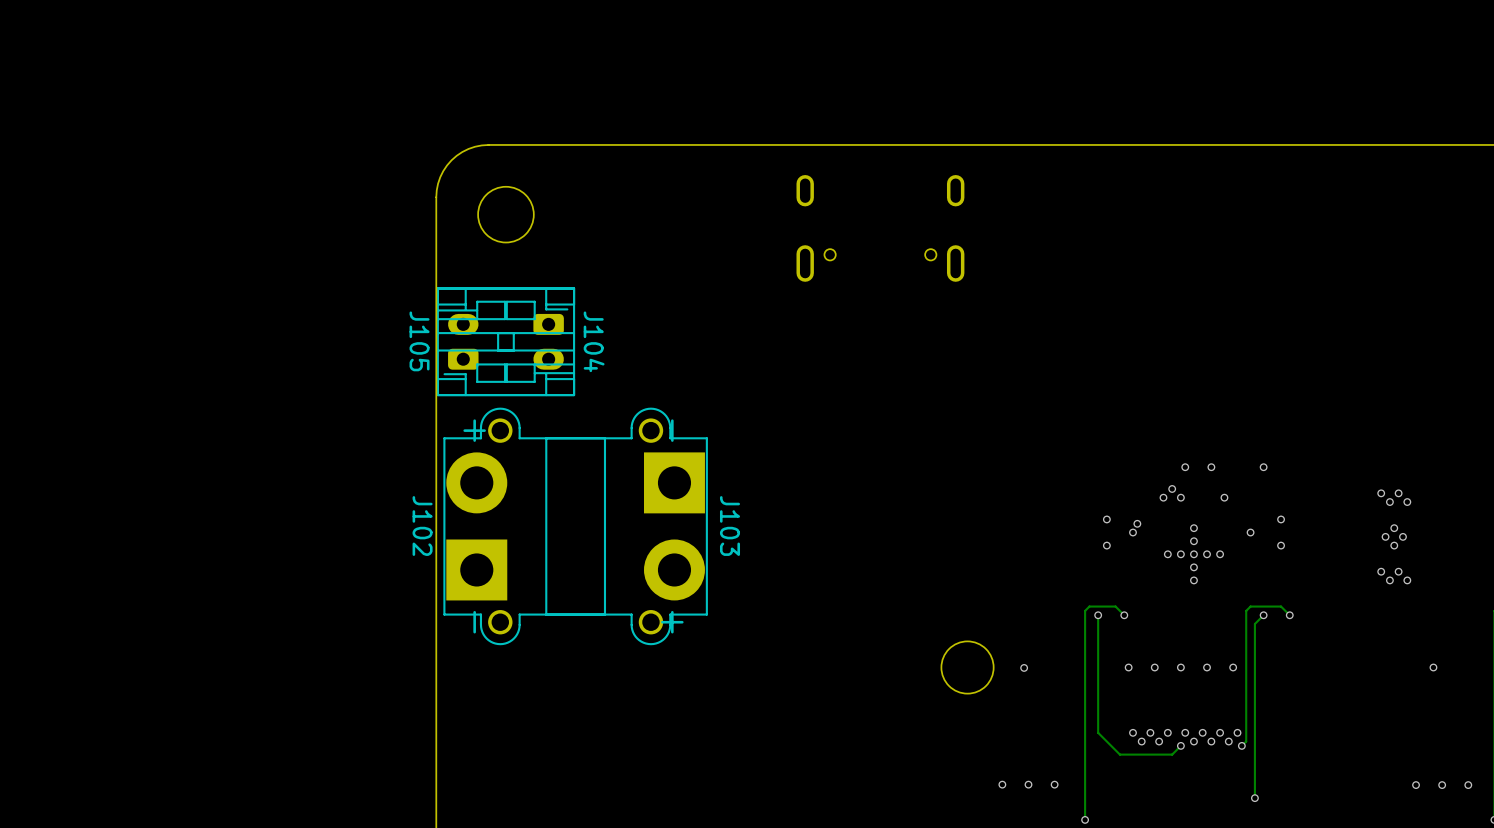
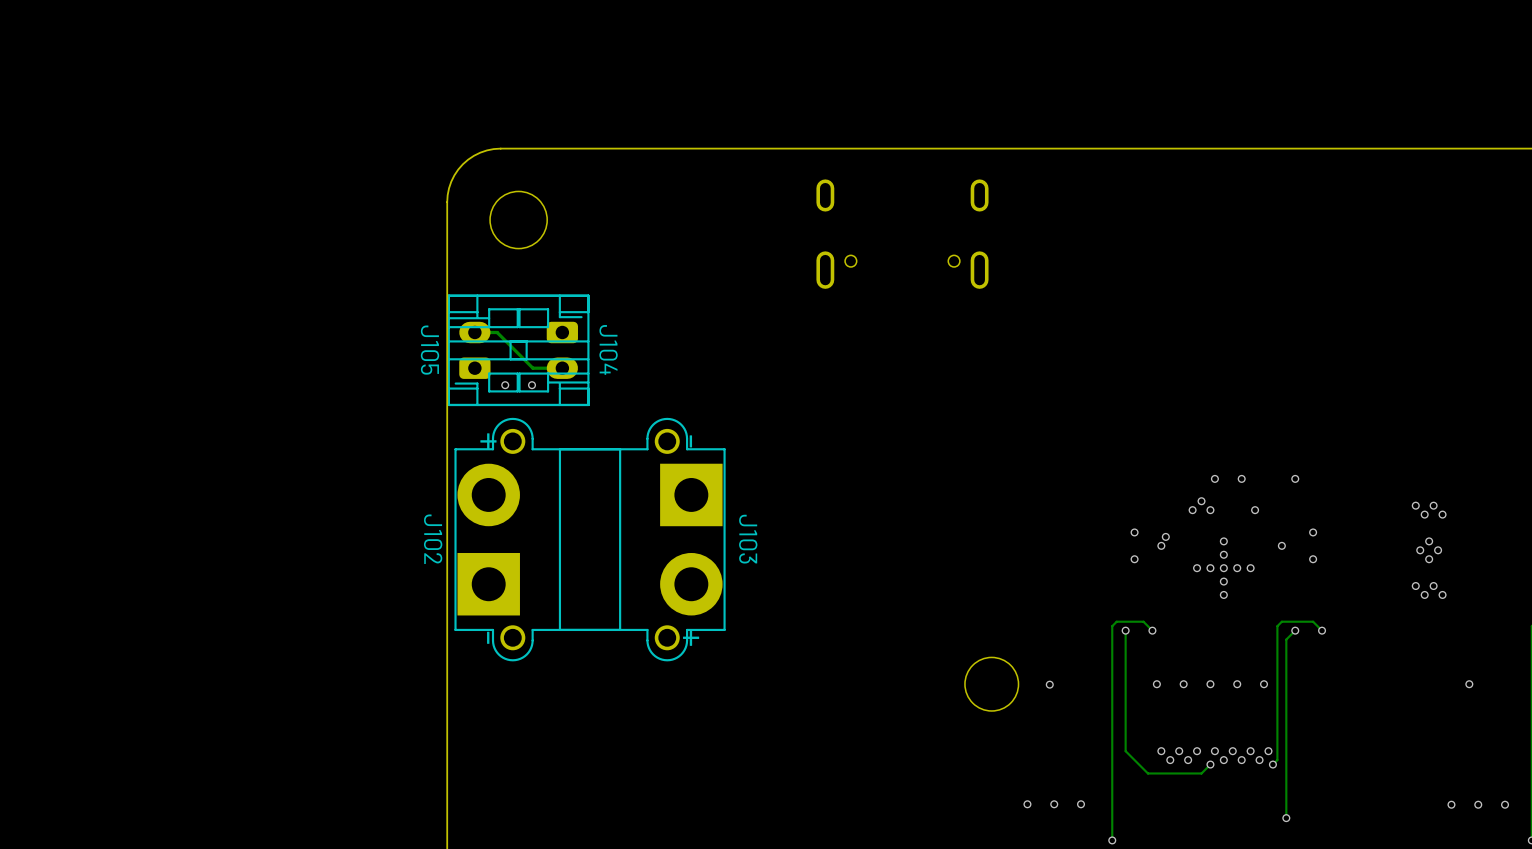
track: none -> (474, 332) (497, 332) (532, 368) (562, 368)
via: none -> (505, 385)
via: none -> (532, 385)

